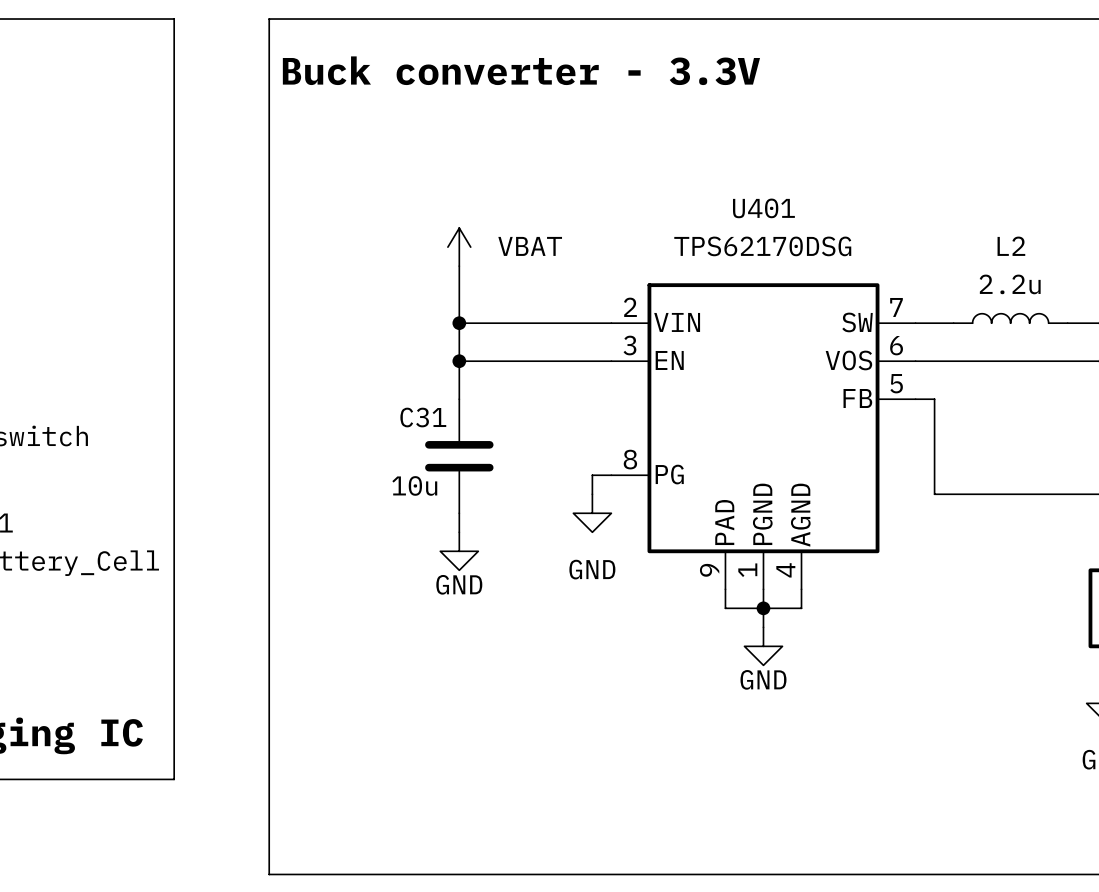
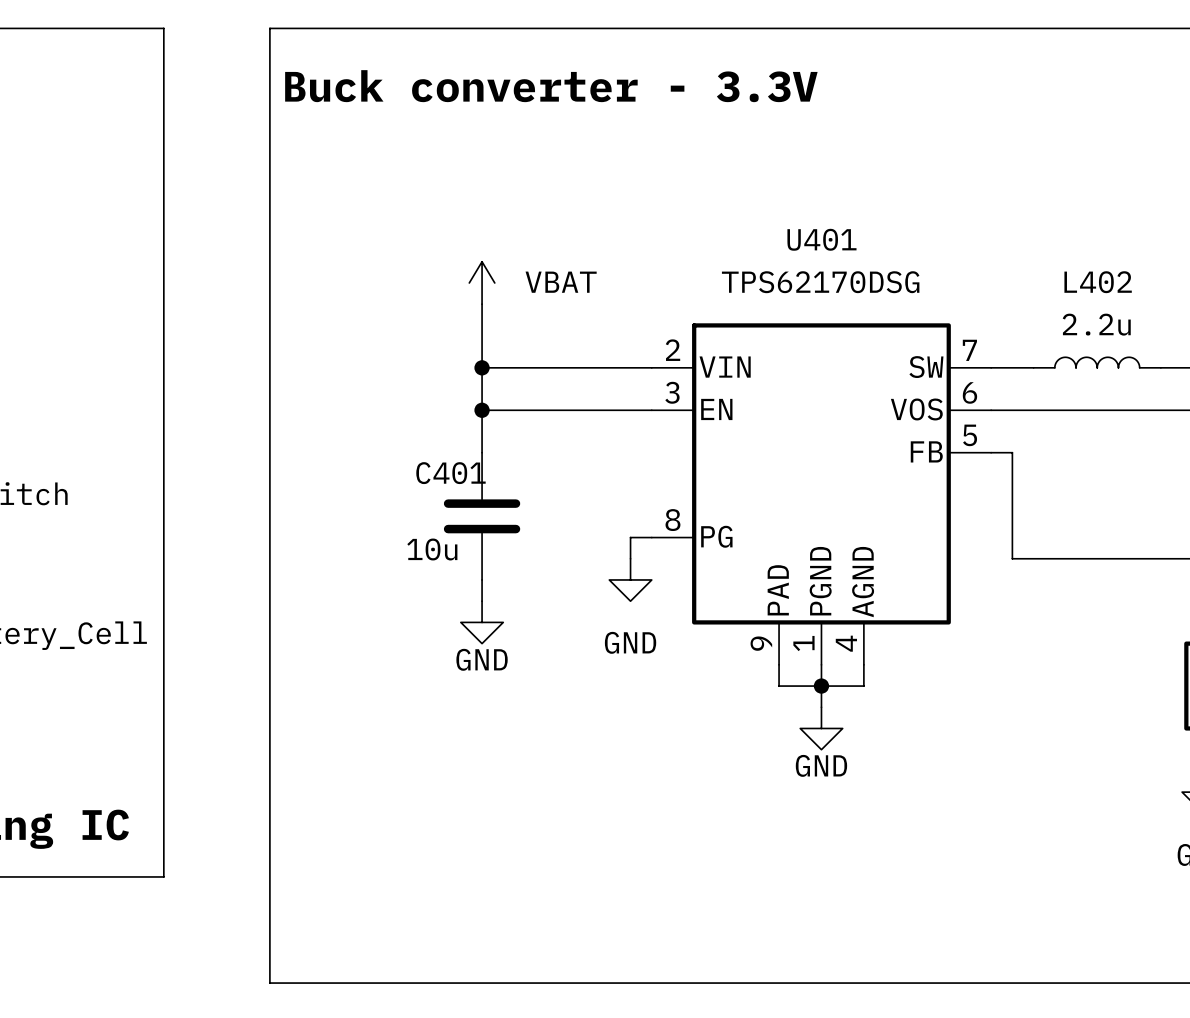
L2 name: L2 (1011, 246) -> L402 (1098, 282)
C31 name: C31 (423, 417) -> C401 (450, 473)

